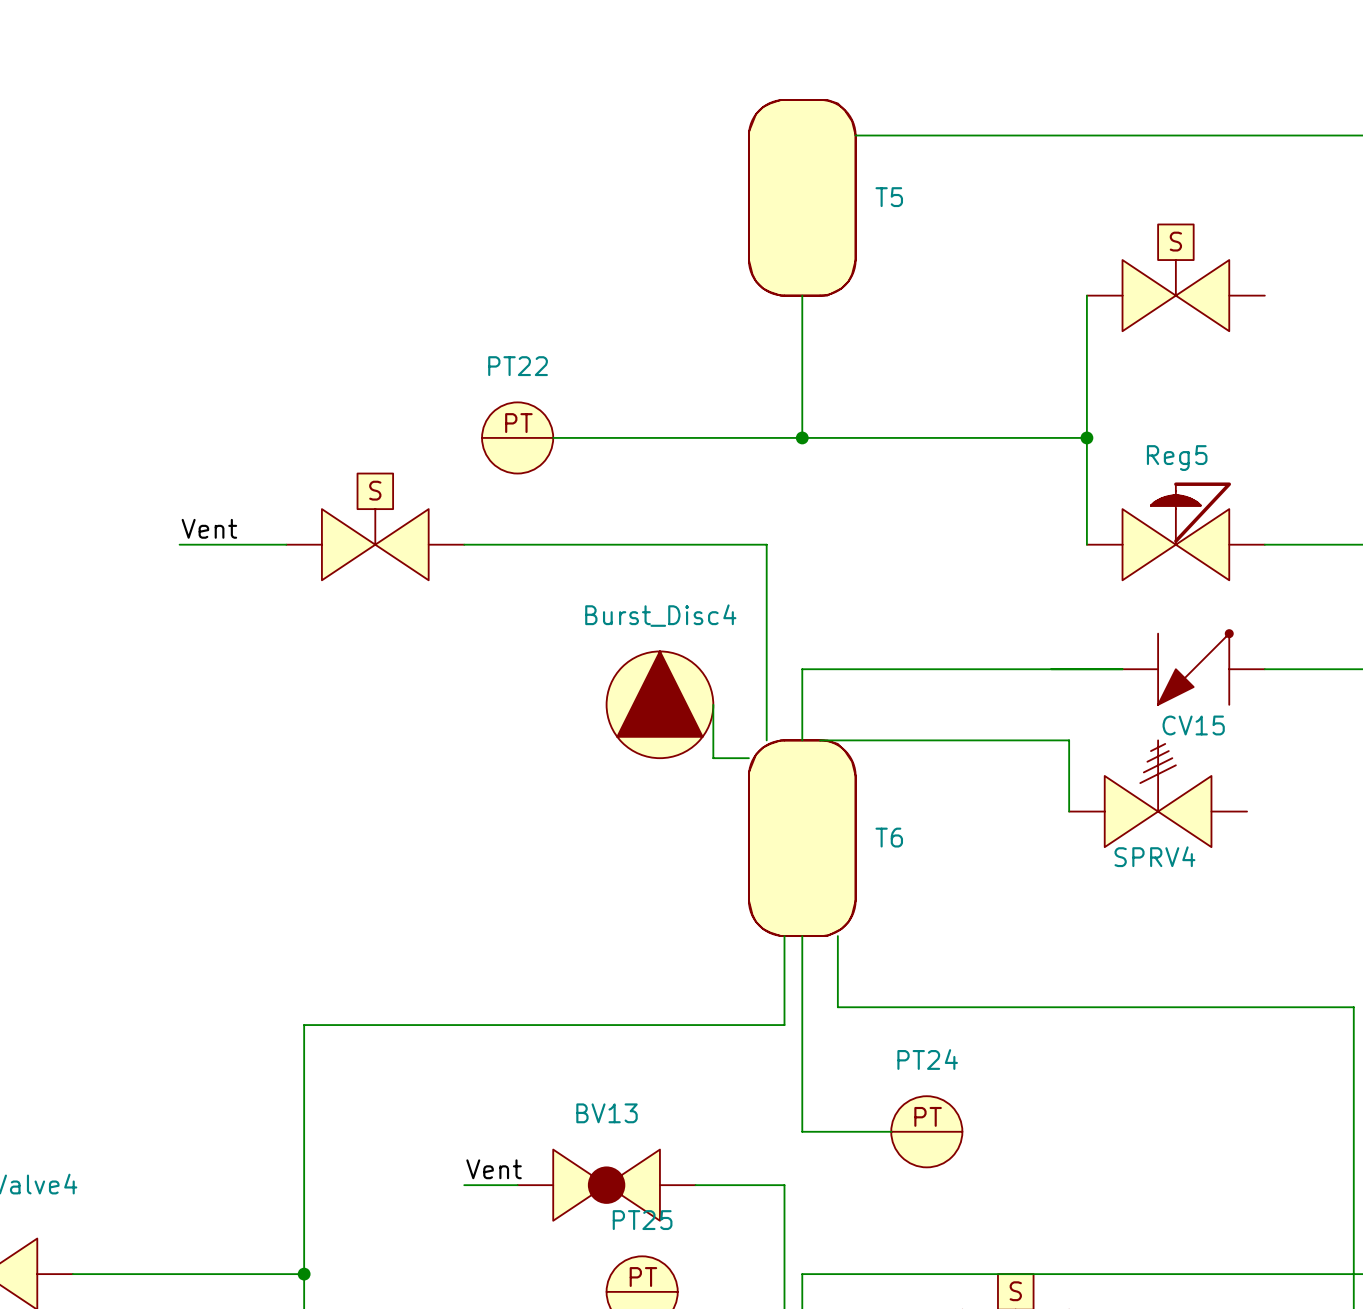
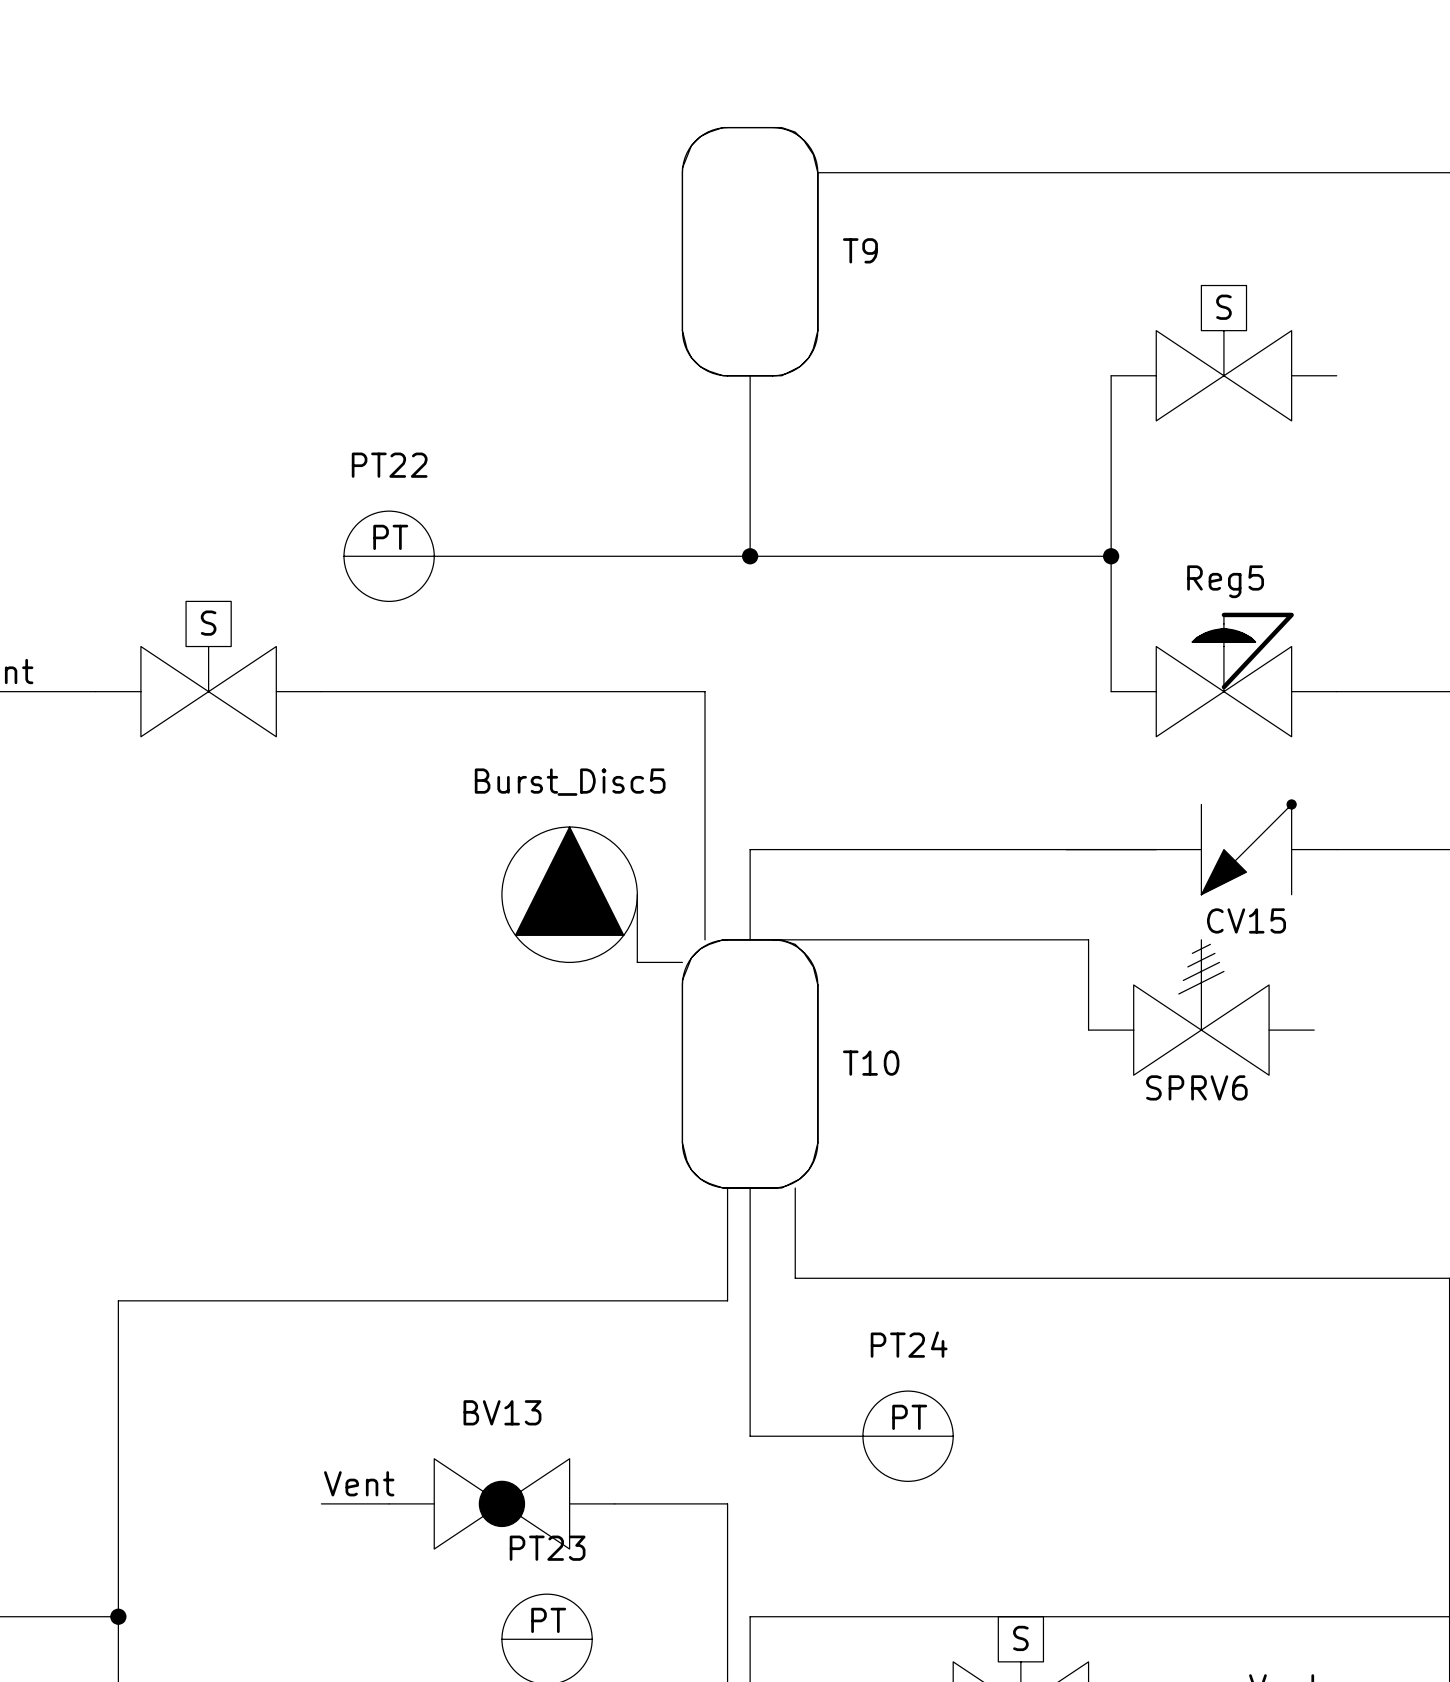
T5 name: T5 (889, 197) -> T9 (860, 250)
Burst_Disc4 name: Burst_Disc4 (660, 615) -> Burst_Disc5 (570, 782)
T6 name: T6 (889, 837) -> T10 (871, 1063)
SPRV4 name: SPRV4 (1154, 856) -> SPRV6 (1196, 1087)
PT25 name: PT25 (642, 1220) -> PT23 (547, 1548)

